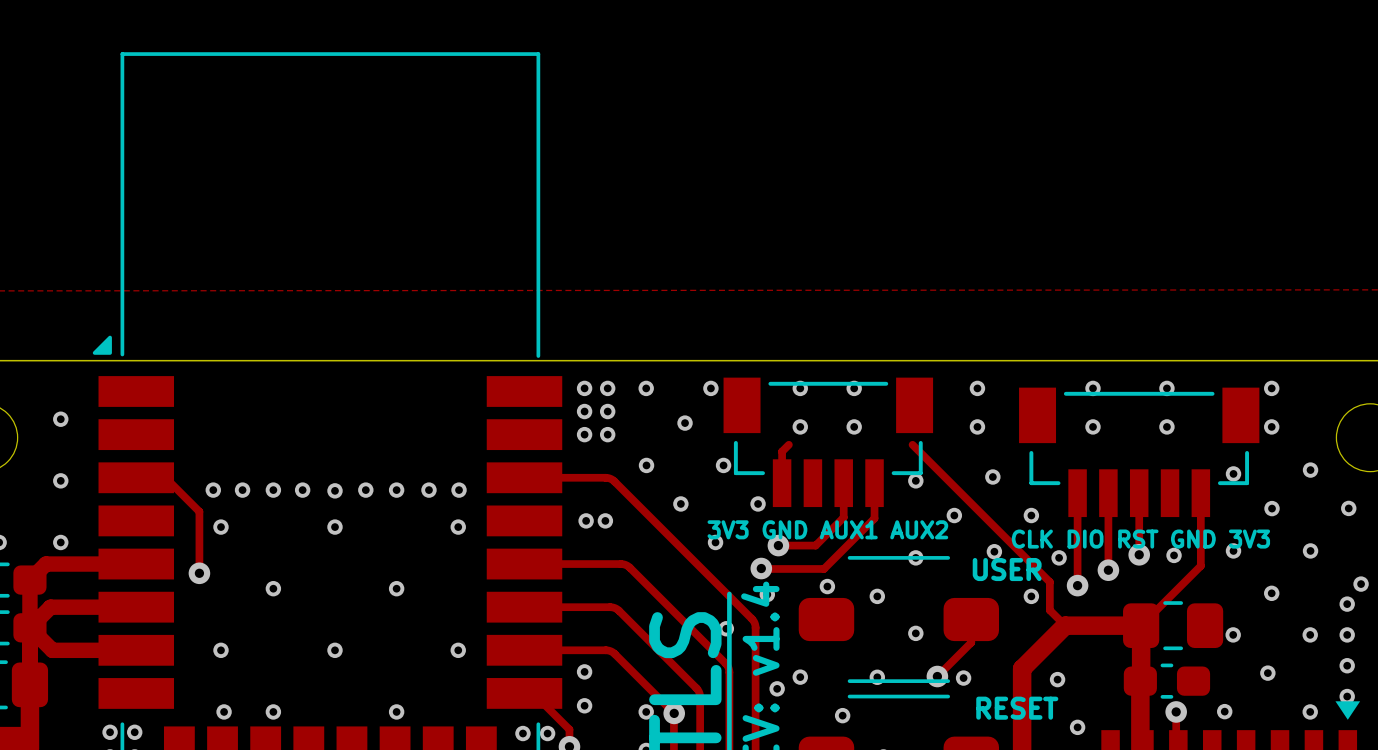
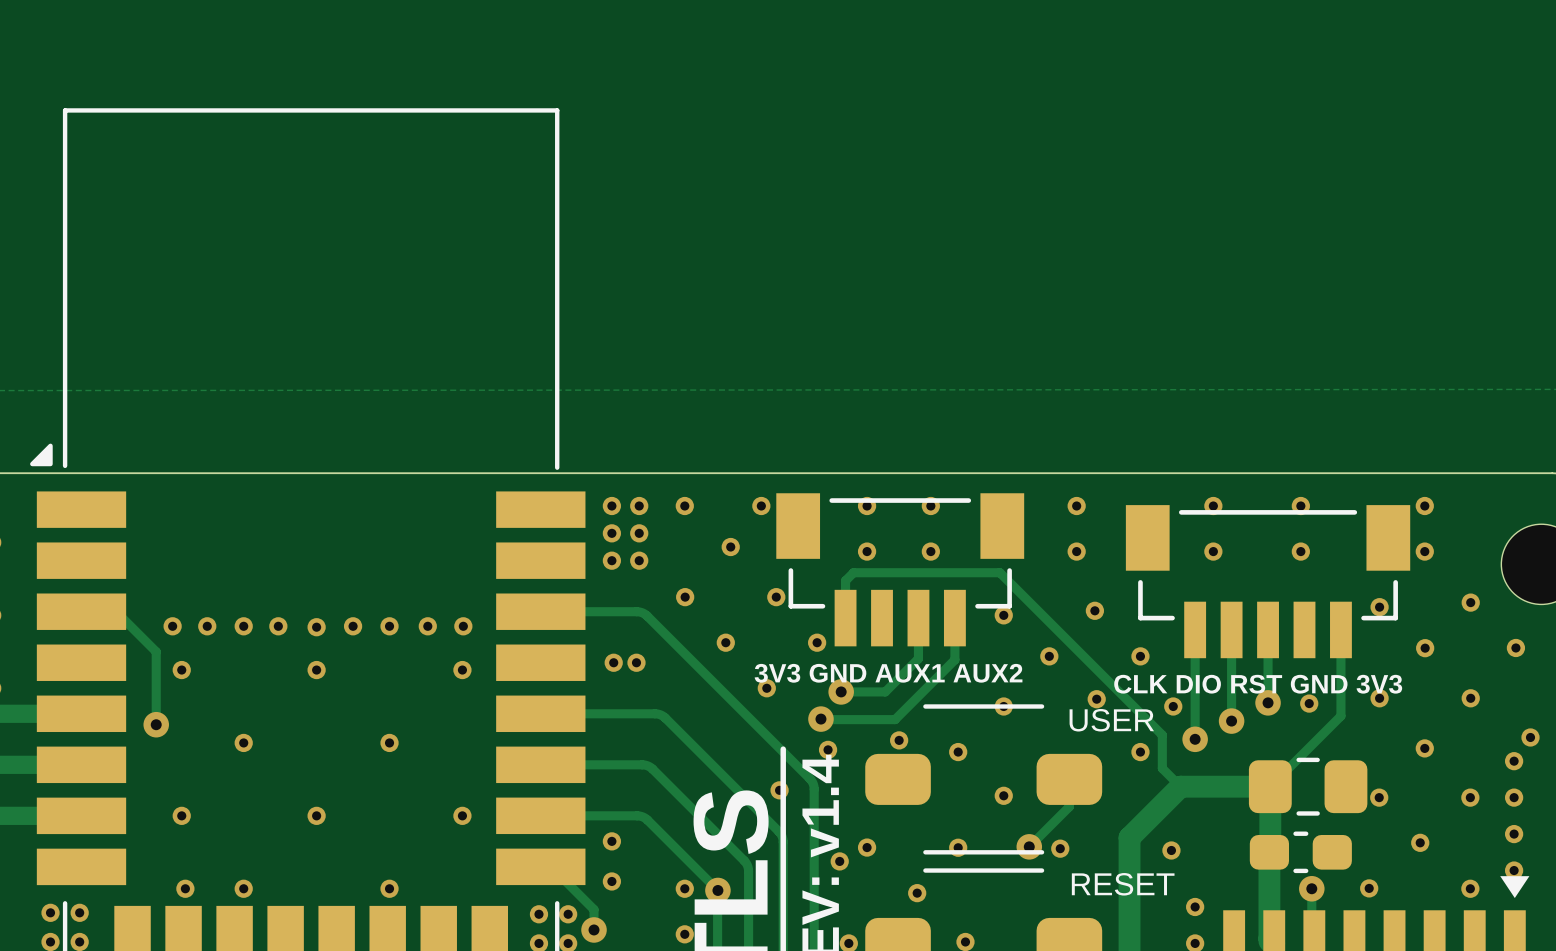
track: none -> (853, 572) (999, 572)

